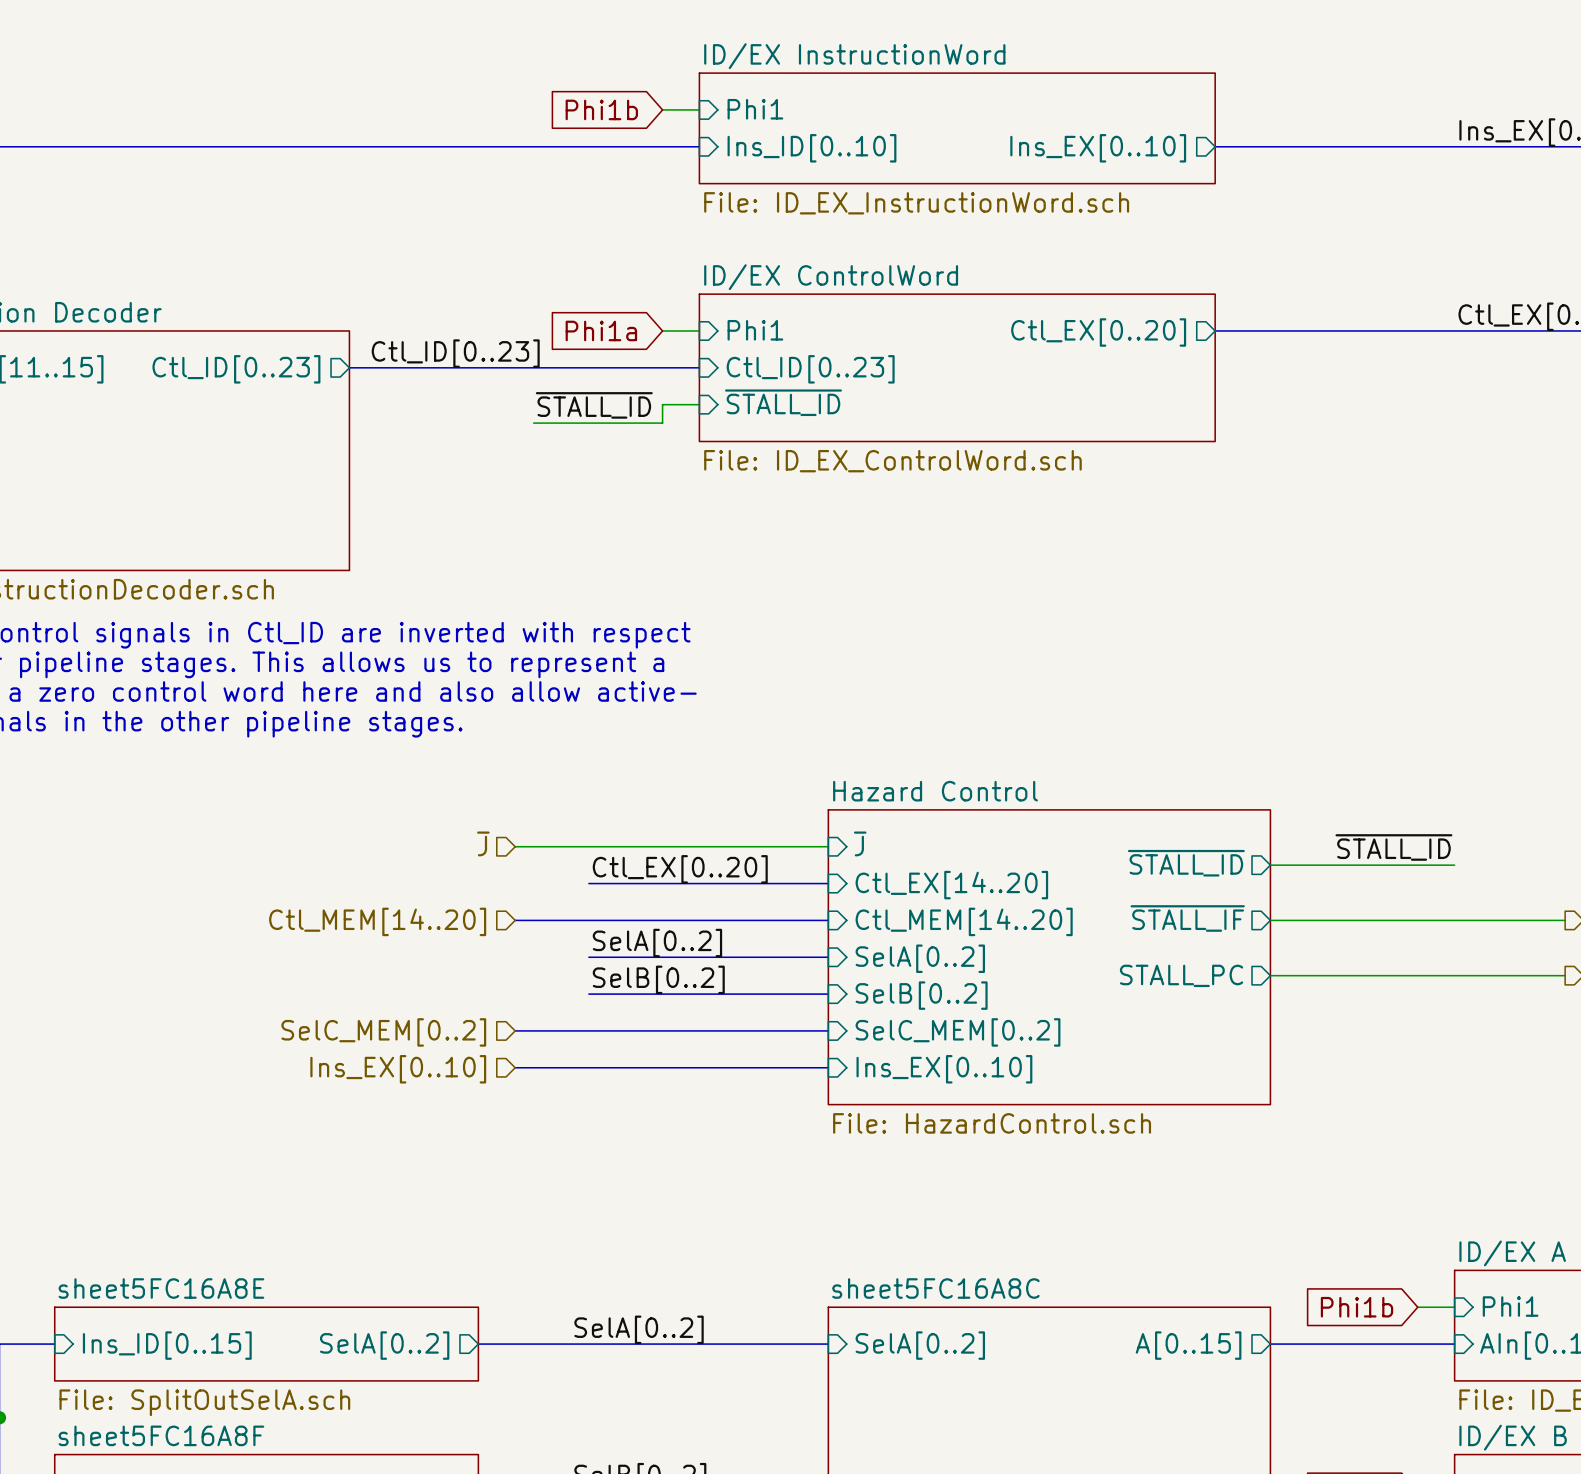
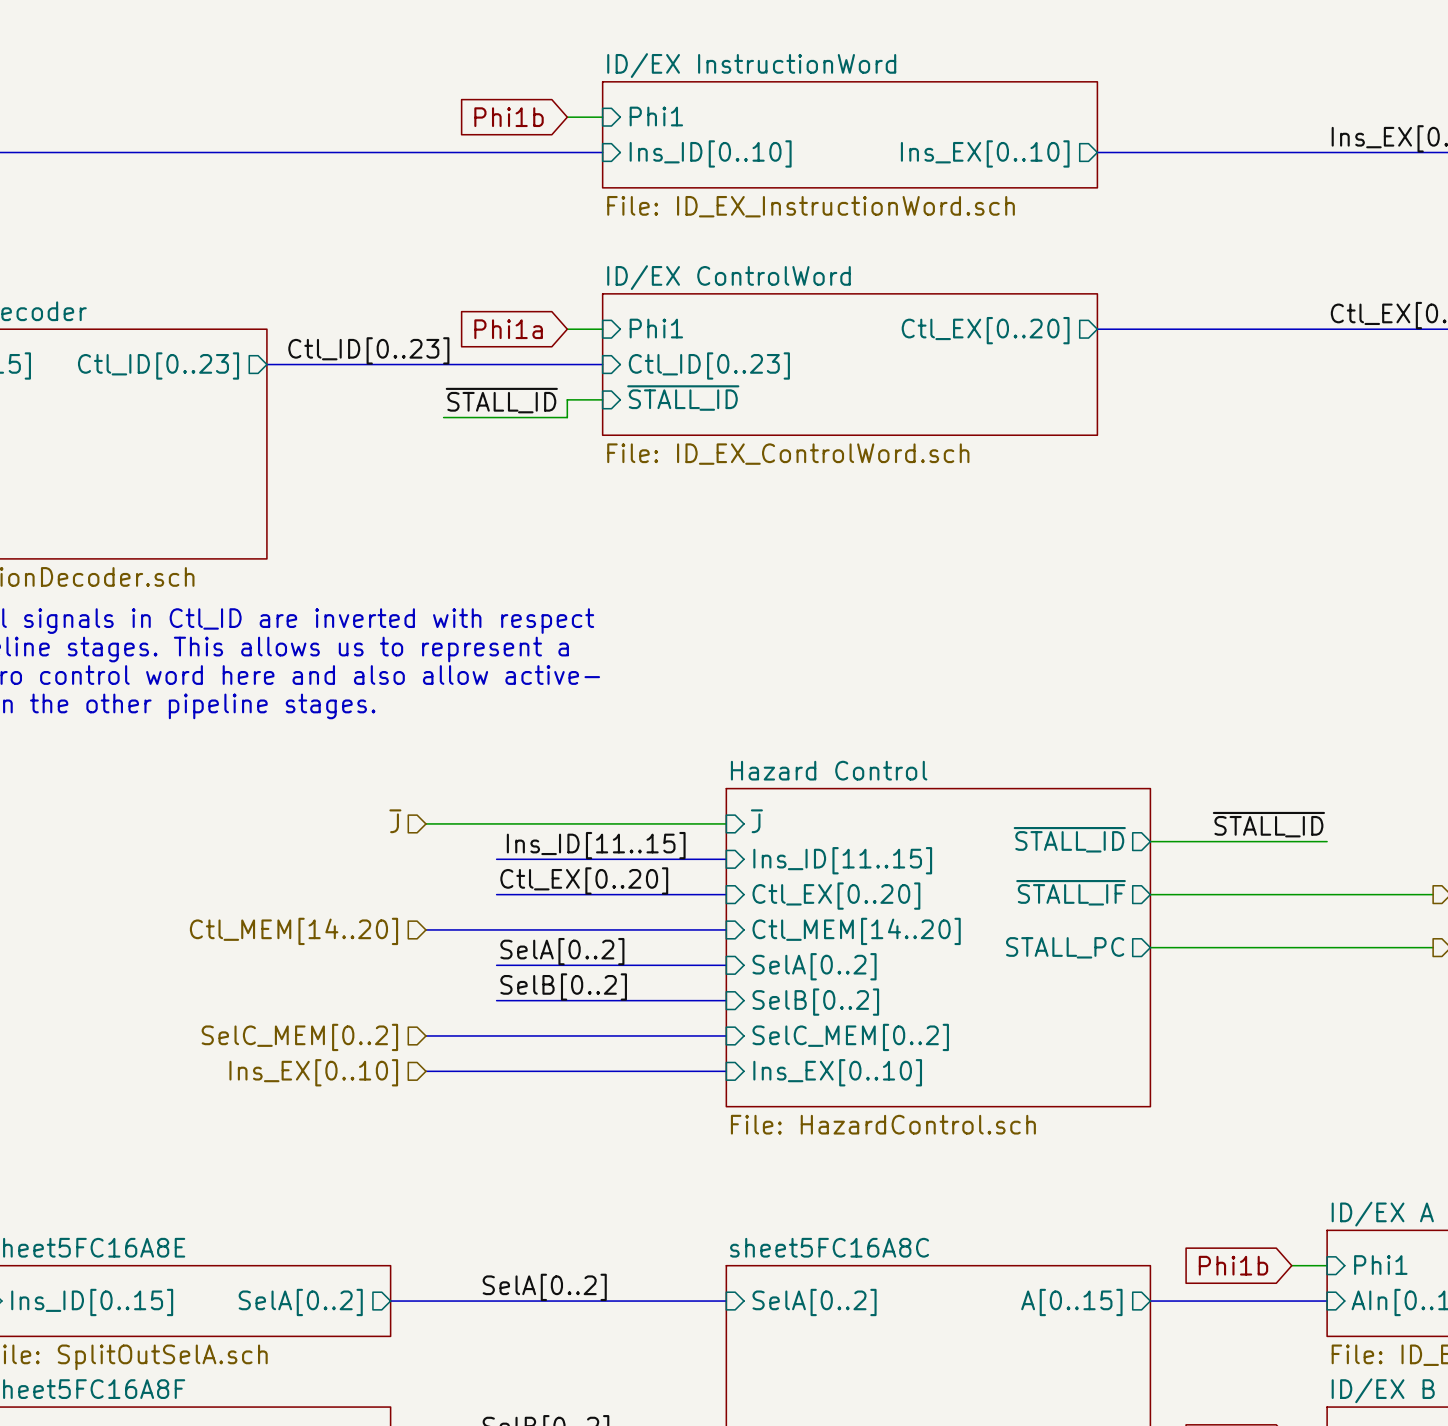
label position: Ctl_EX[0..20] (680, 869) -> Ctl_EX[0..20] (584, 880)
label: none -> Ins_ID[11..15] (596, 845)
sheet pin: Ctl_EX[14..20] (951, 885) -> Ins_ID[11..15] (842, 860)
bus: (515, 920) (588, 920) -> (425, 929) (496, 929)
hierarchical label position: Ctl_MEM[14..20] (377, 921) -> Ctl_MEM[14..20] (294, 931)
sheet pin: Ctl_MEM[14..20] (964, 921) -> Ctl_EX[0..20] (836, 896)
label: SelA[0..2] (657, 943) -> none
sheet Hazard Control: File: HazardControl.sch (1049, 957) -> none
sheet pin: SelA[0..2] (920, 958) -> Ctl_MEM[14..20] (856, 931)
sheet Hazard Control: none -> File: HazardControl.sch (938, 947)
label: SelB[0..2] (658, 979) -> SelA[0..2] (562, 951)
sheet pin: SelB[0..2] (921, 995) -> SelA[0..2] (814, 966)
label: none -> SelB[0..2] (563, 986)
bus: (515, 1030) (588, 1030) -> none
hierarchical label: SelC_MEM[0..2] (383, 1032) -> none
sheet pin: SelC_MEM[0..2] (958, 1032) -> SelB[0..2] (815, 1002)
hierarchical label: Ins_EX[0..10] (398, 1069) -> SelC_MEM[0..2] (299, 1037)
sheet pin: Ins_EX[0..10] (944, 1069) -> SelC_MEM[0..2] (850, 1037)
bus: none -> (425, 1071) (726, 1071)
hierarchical label: none -> Ins_EX[0..10] (313, 1072)
sheet pin: none -> Ins_EX[0..10] (837, 1072)

